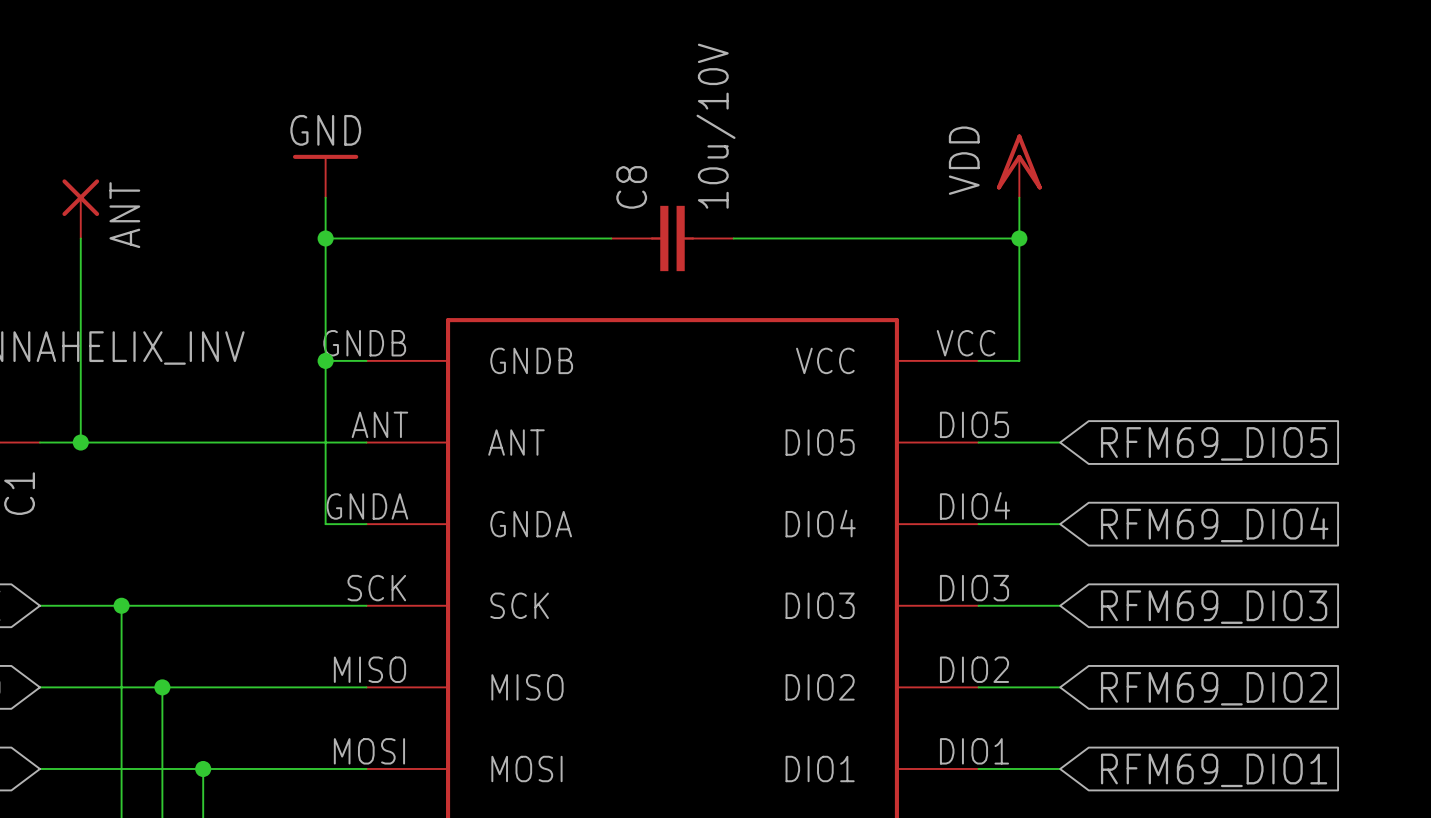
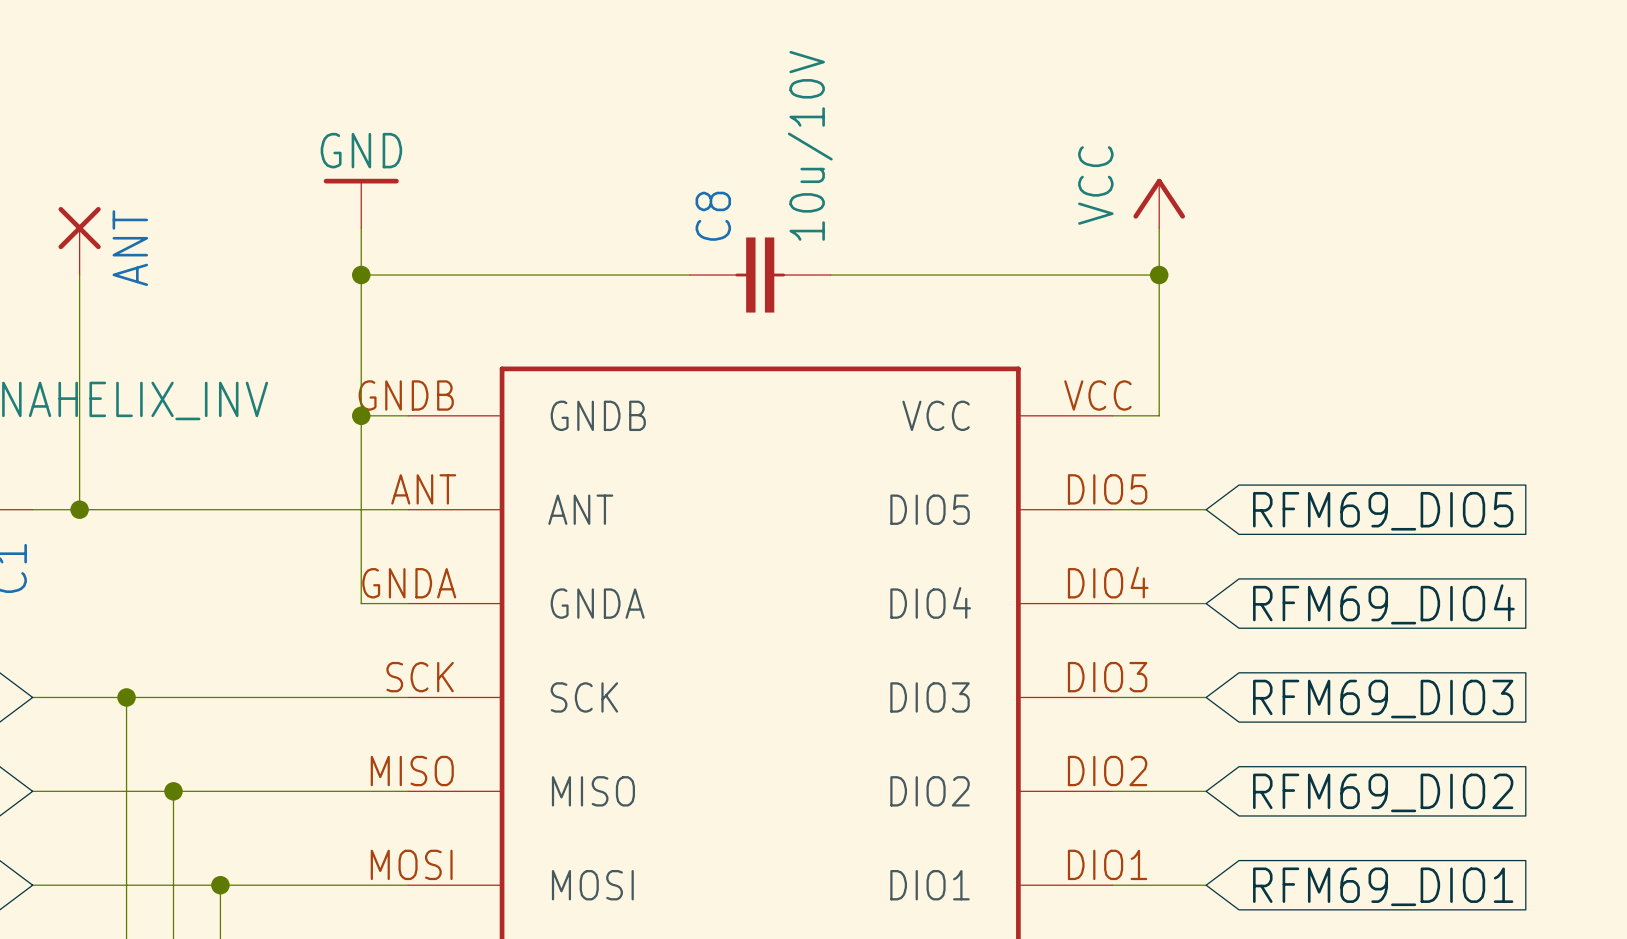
power symbol: VDD (1019, 166) -> VCC (1159, 203)

